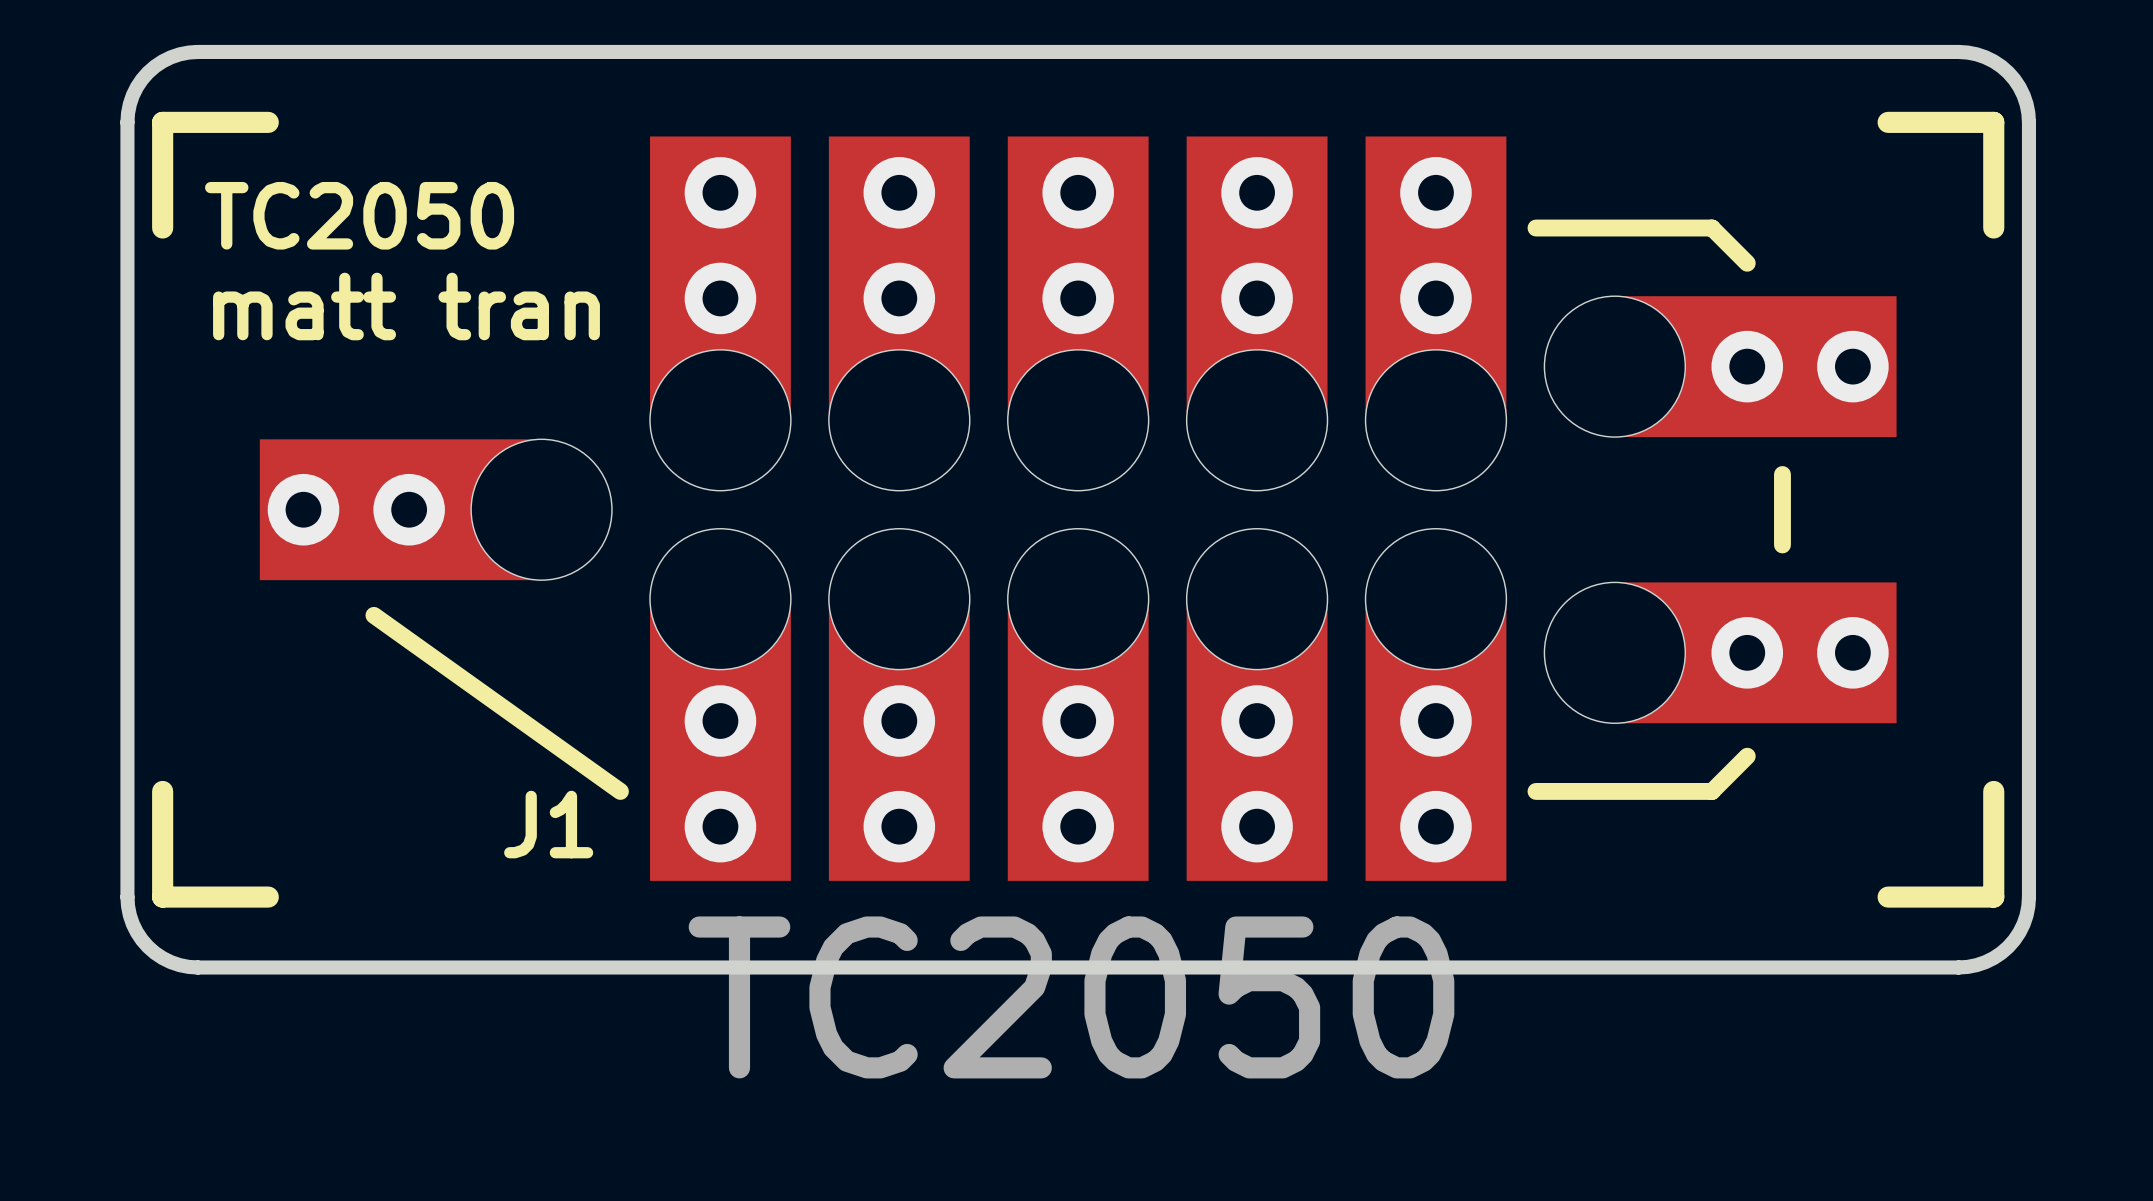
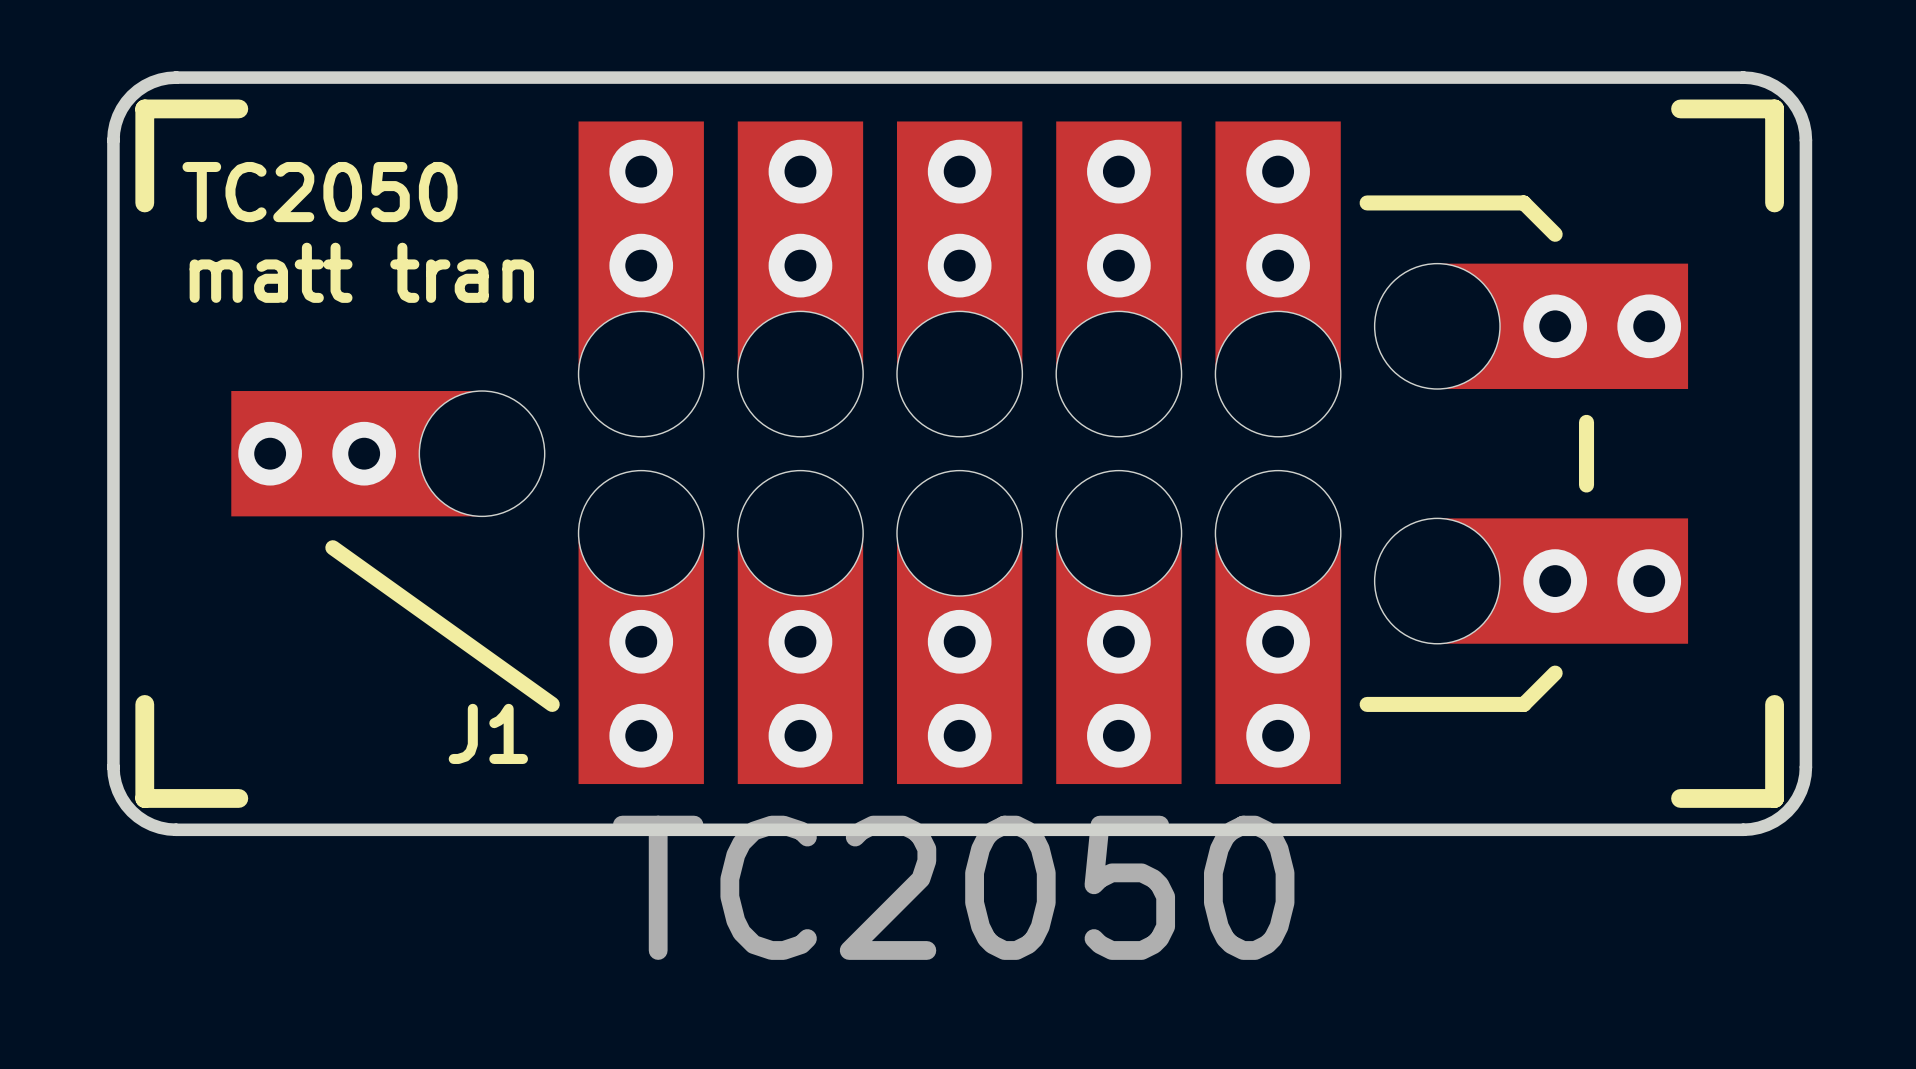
board edge: (127, 157) (128, 113) (136, 87) (148, 72) (162, 61) (179, 54) (197, 51) (1958, 51) (1976, 54) (1993, 61) (2008, 72) (2019, 87) (2028, 113) (2028, 157) -> (113, 140) (118, 116) (131, 95) (152, 82) (176, 77) (1743, 77) (1767, 82) (1787, 95) (1801, 116) (1805, 140)
board edge: (127, 861) (128, 906) (136, 932) (148, 946) (162, 958) (179, 965) (197, 967) (1958, 967) (1976, 965) (1993, 958) (2008, 946) (2019, 932) (2028, 906) (2028, 861) -> (113, 767) (118, 791) (131, 811) (152, 825) (176, 829) (1743, 829) (1767, 825) (1787, 811) (1801, 791) (1805, 767)

